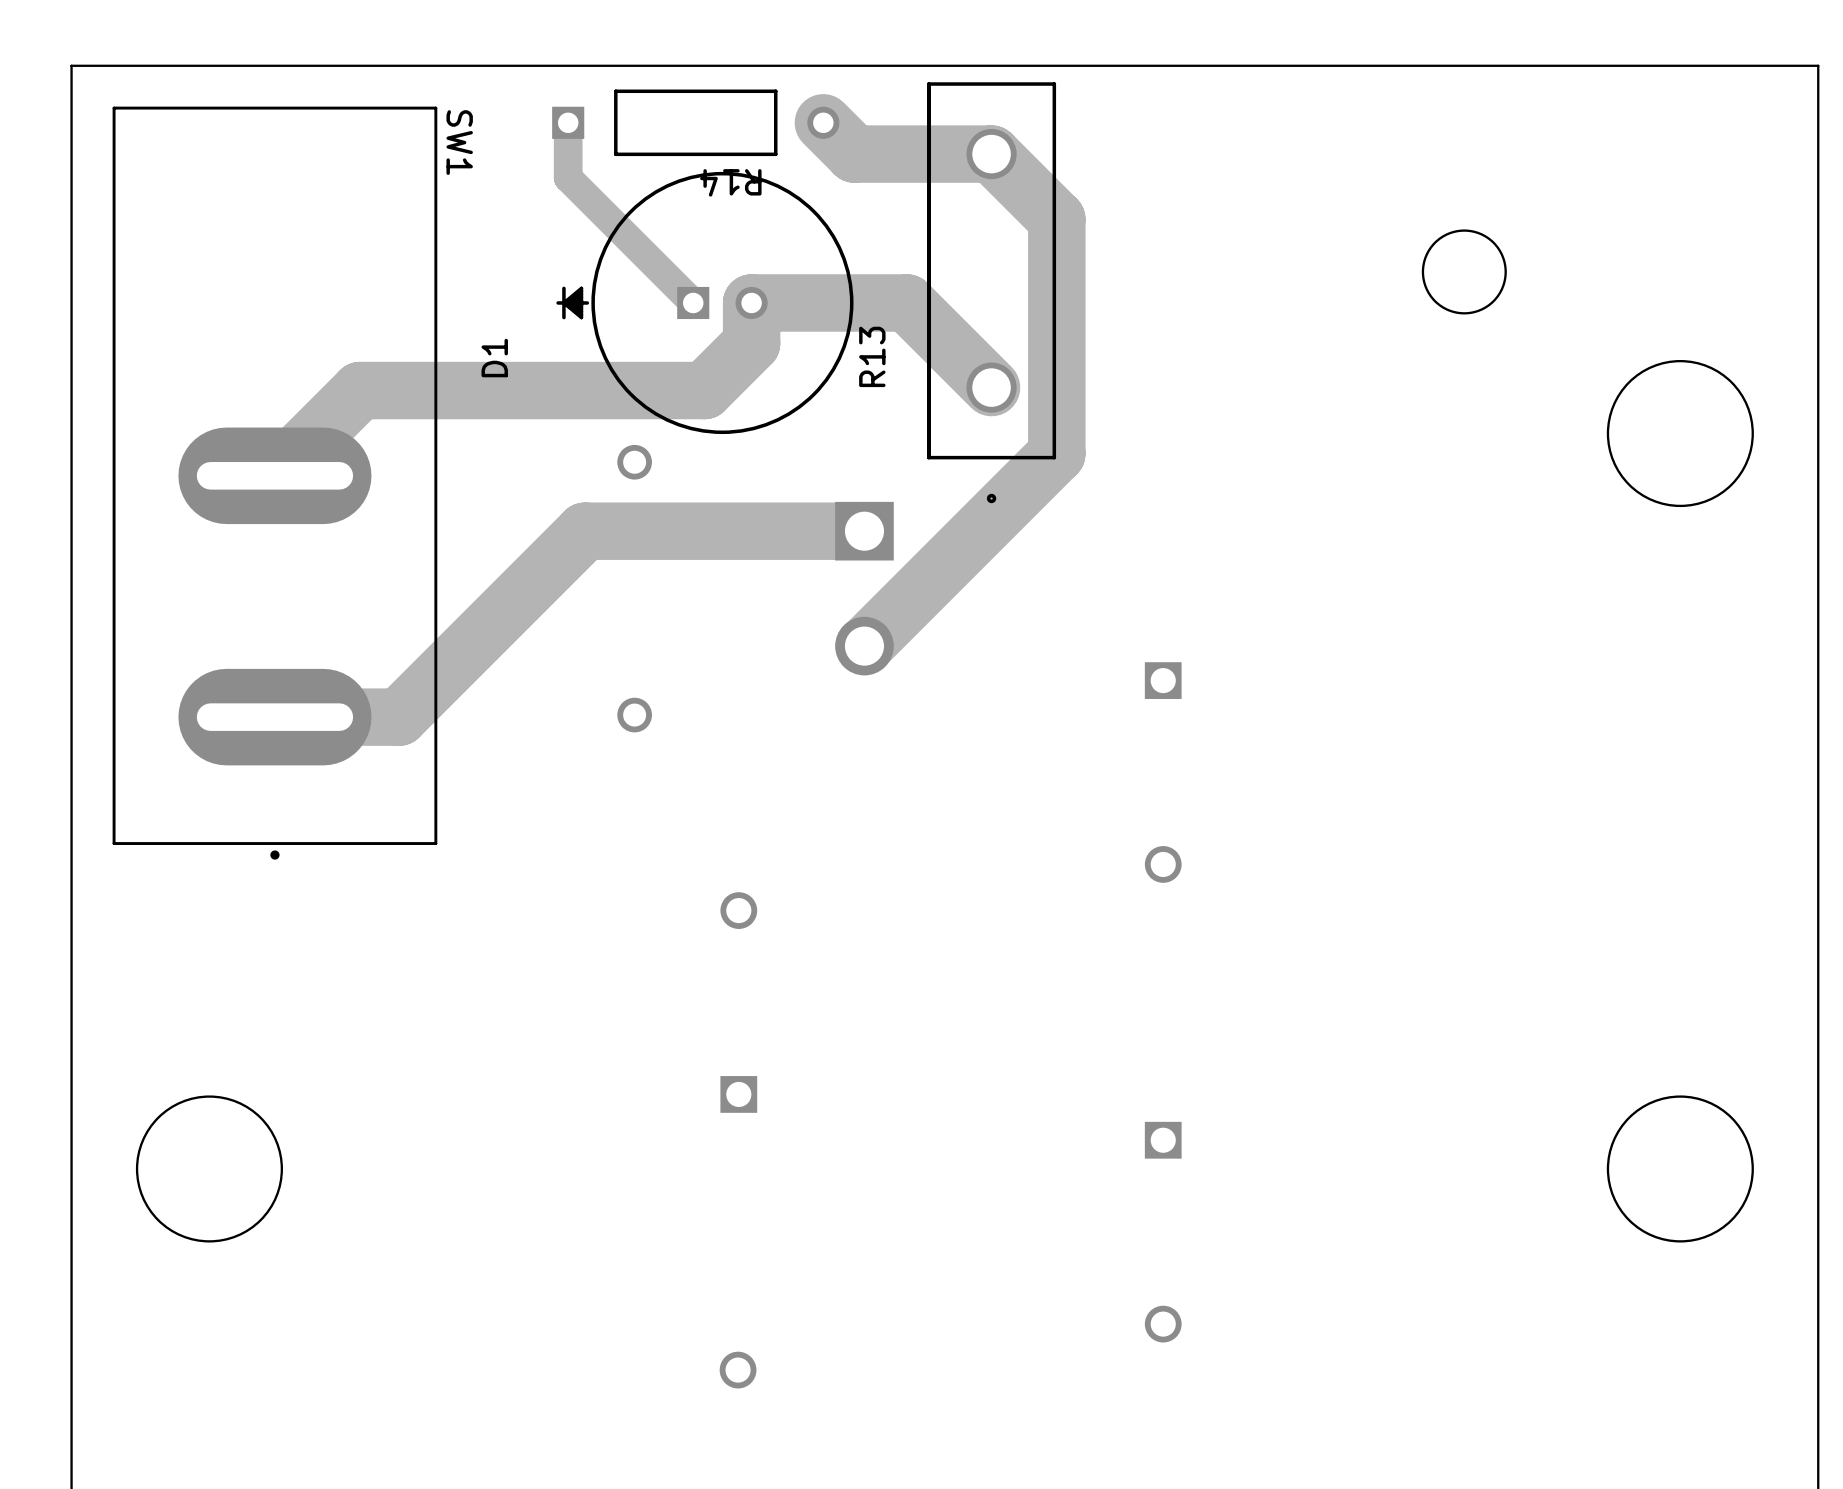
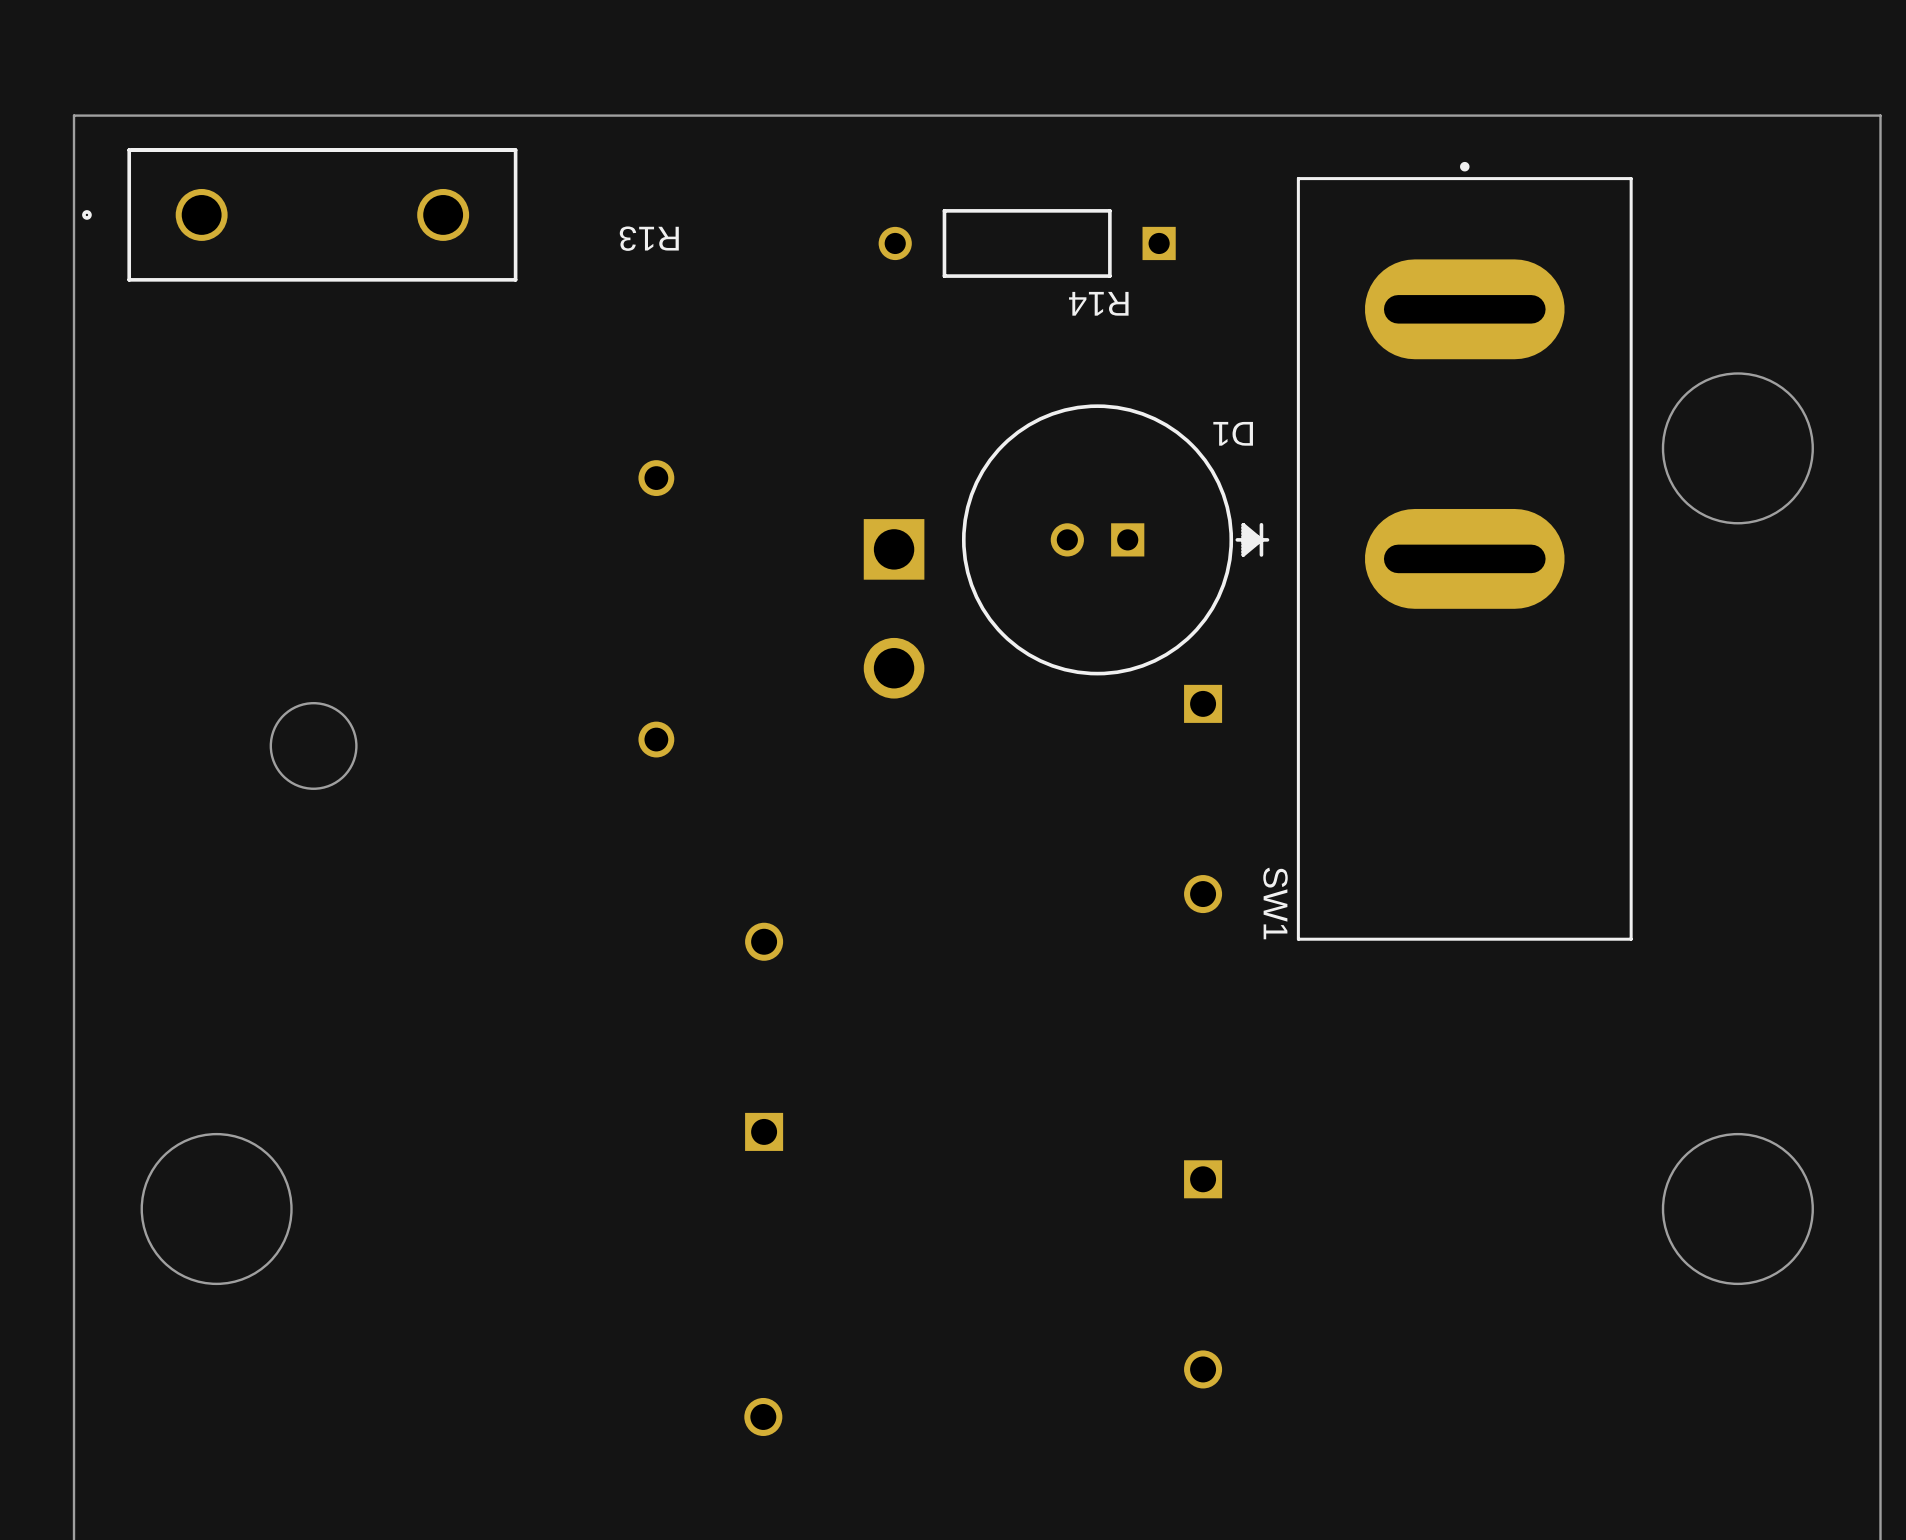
board edge: (1818, 111) (1818, 65) (71, 65) (71, 111) -> (1880, 115) (74, 115)
track: (568, 122) (568, 177) (693, 302) -> none
R14 rotation: 0° (695, 122) -> 180° (1027, 243)
R14 position: (695, 122) -> (1027, 243)
track: (823, 122) (854, 154) (991, 154) (1056, 219) (1056, 453) (864, 646) -> none
round board edge: [1421, 229, 1507, 315] -> none
R13 rotation: 0° (991, 292) -> 90° clockwise (299, 214)
R13 position: (991, 292) -> (299, 214)
D1 rotation: 0° (704, 302) -> 180° (1115, 539)
D1 position: (704, 302) -> (1115, 539)
R13 name position: R13 (872, 356) -> R13 (649, 238)
D1 name position: D1 (494, 358) -> D1 (1233, 433)
track: (991, 387) (906, 302) (751, 302) (751, 343) (704, 390) (360, 390) (274, 475) -> none
SW1 rotation: 0° (274, 483) -> 180° (1464, 551)
SW1 position: (274, 483) -> (1464, 551)
track: (864, 531) (584, 531) (399, 717) (274, 717) -> none
round board edge: none -> [269, 701, 358, 790]

